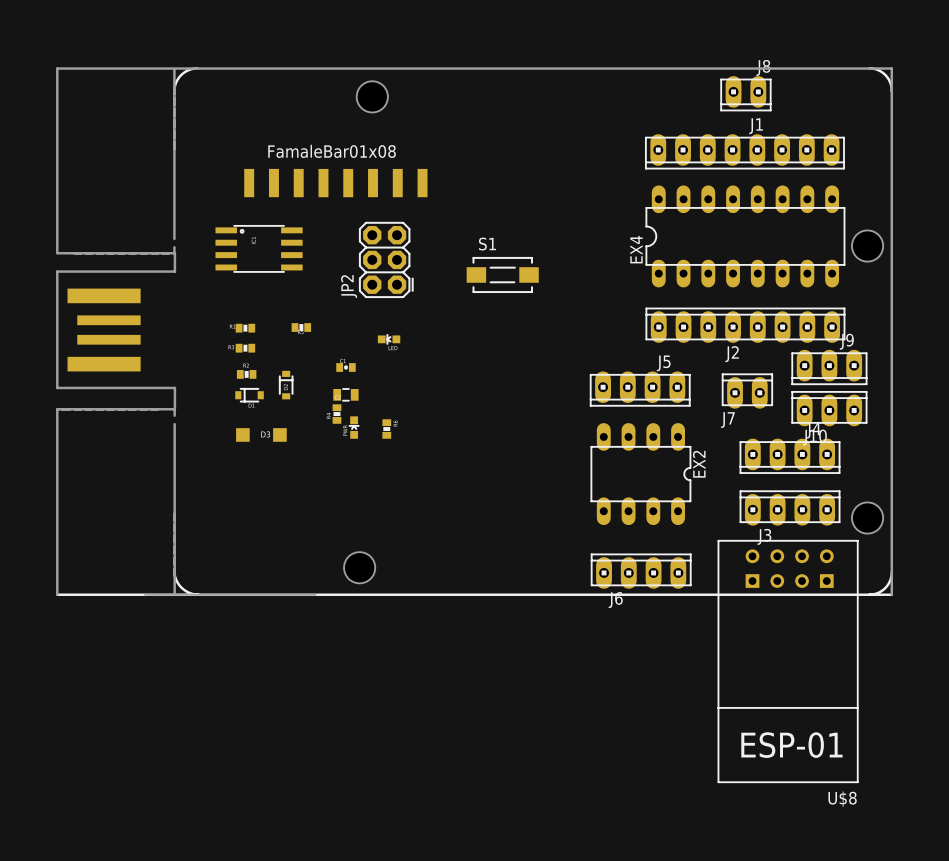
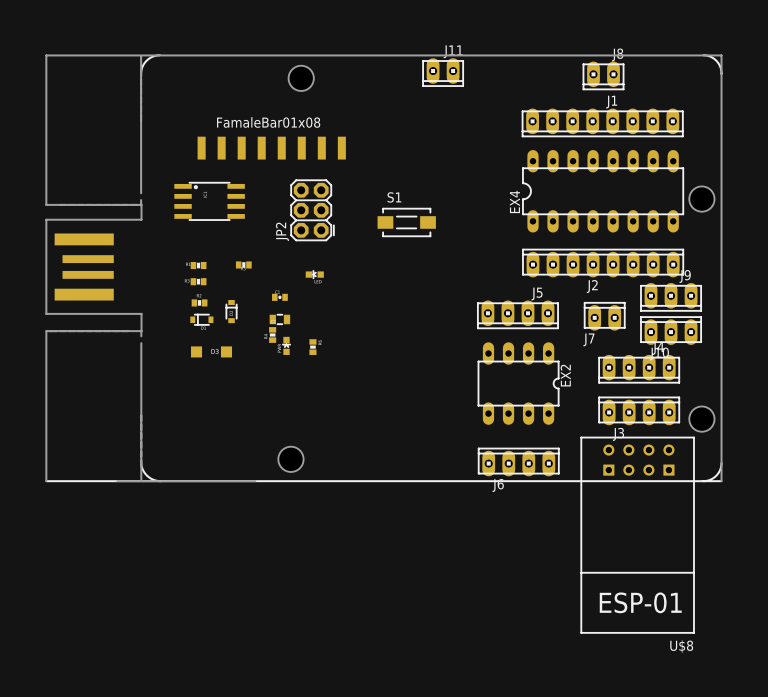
J11: none -> (443, 72)

